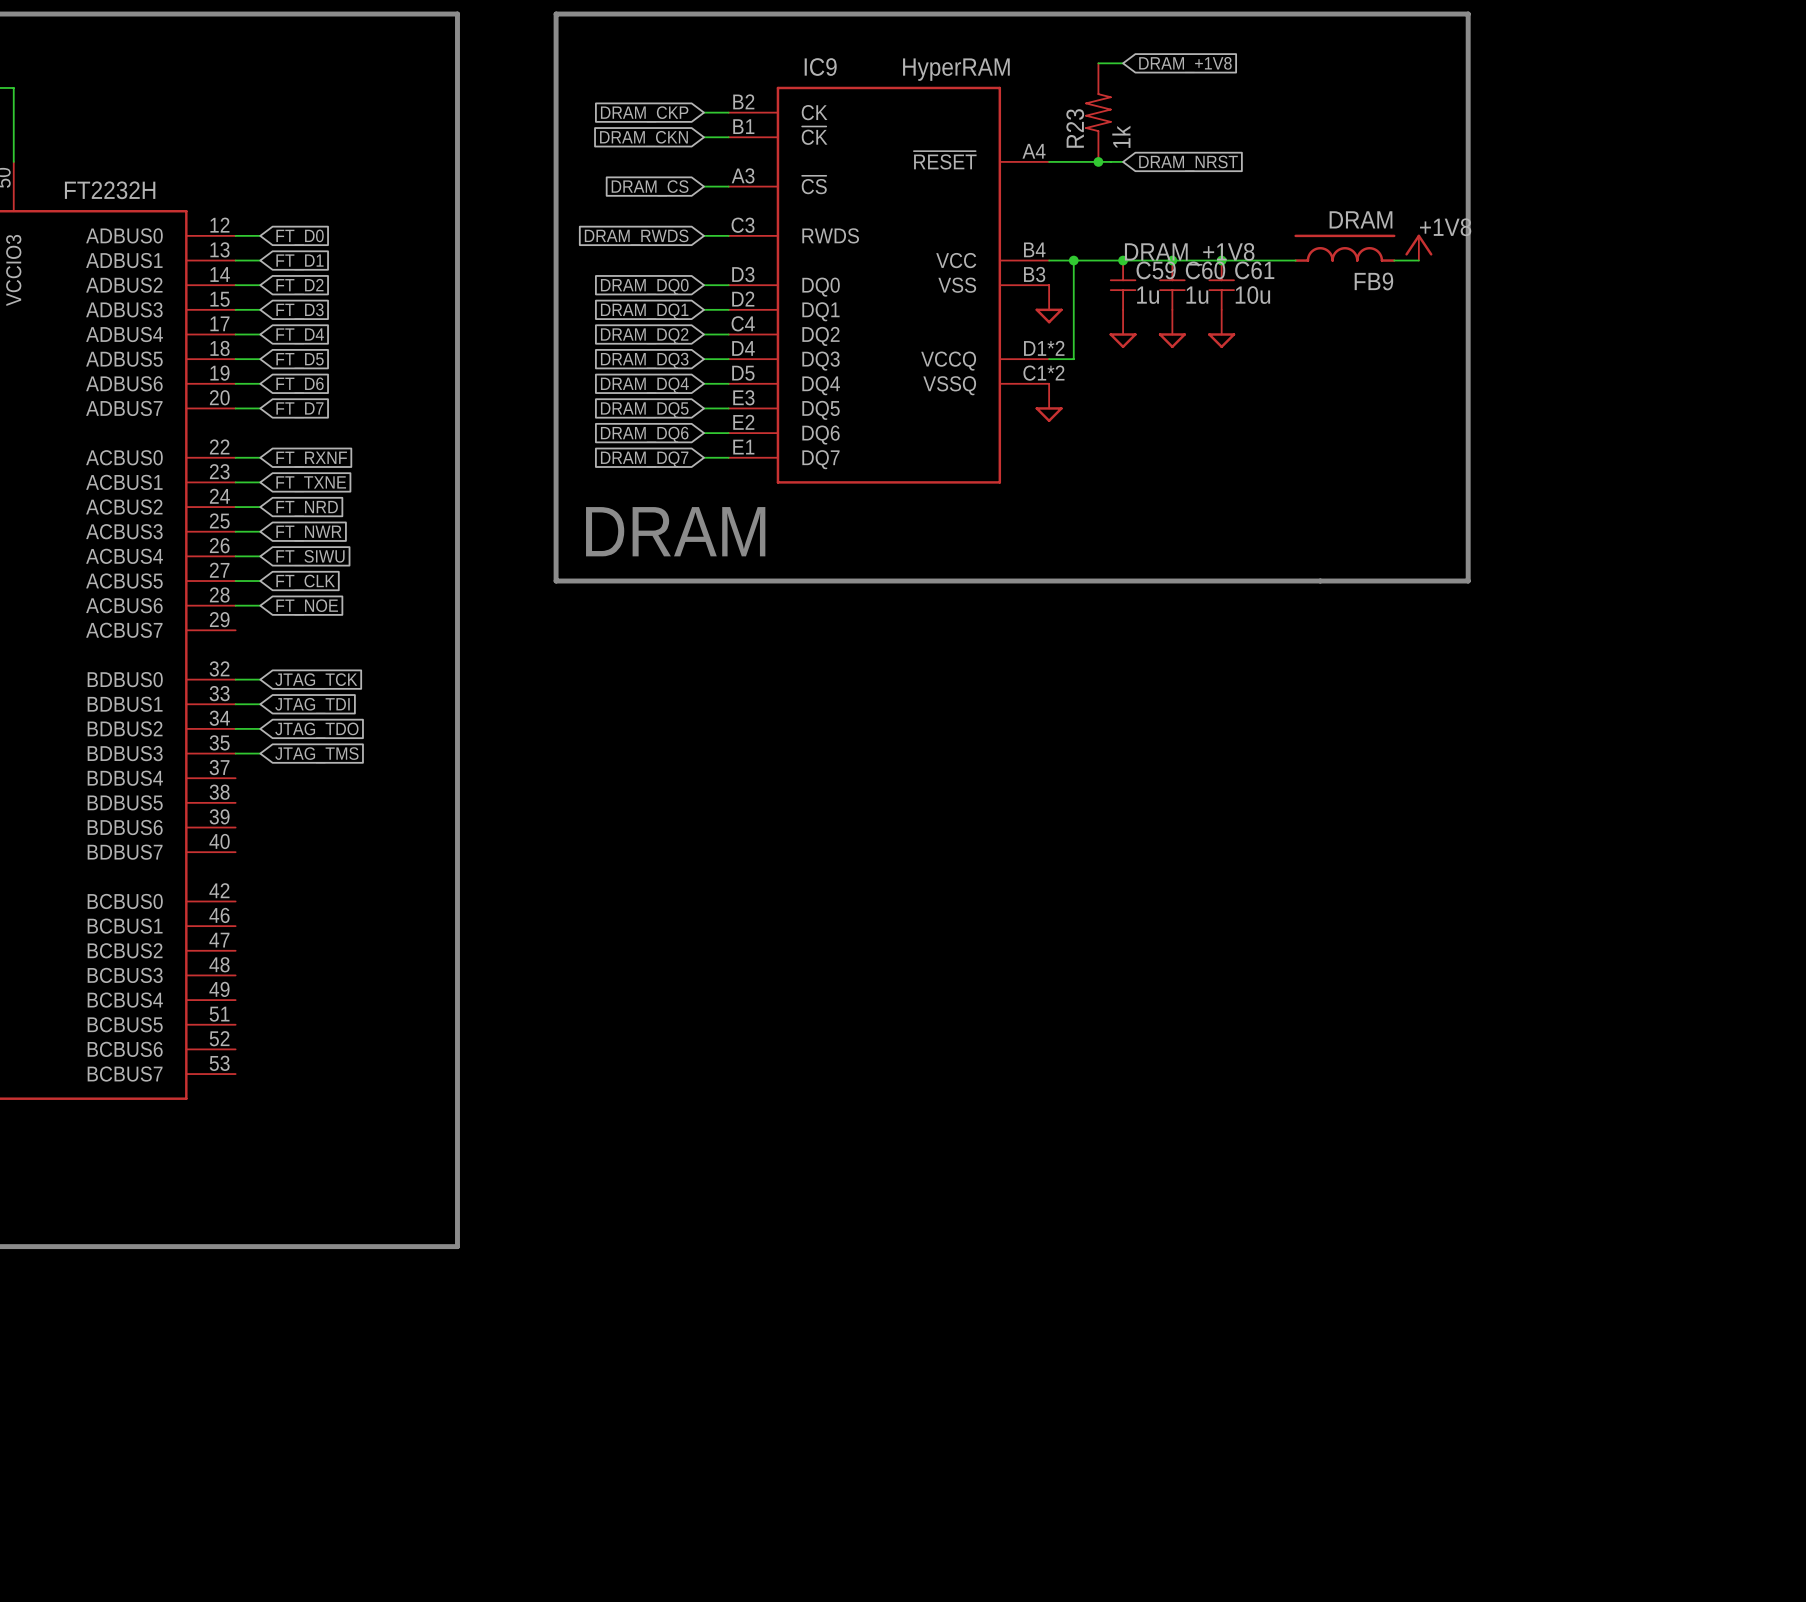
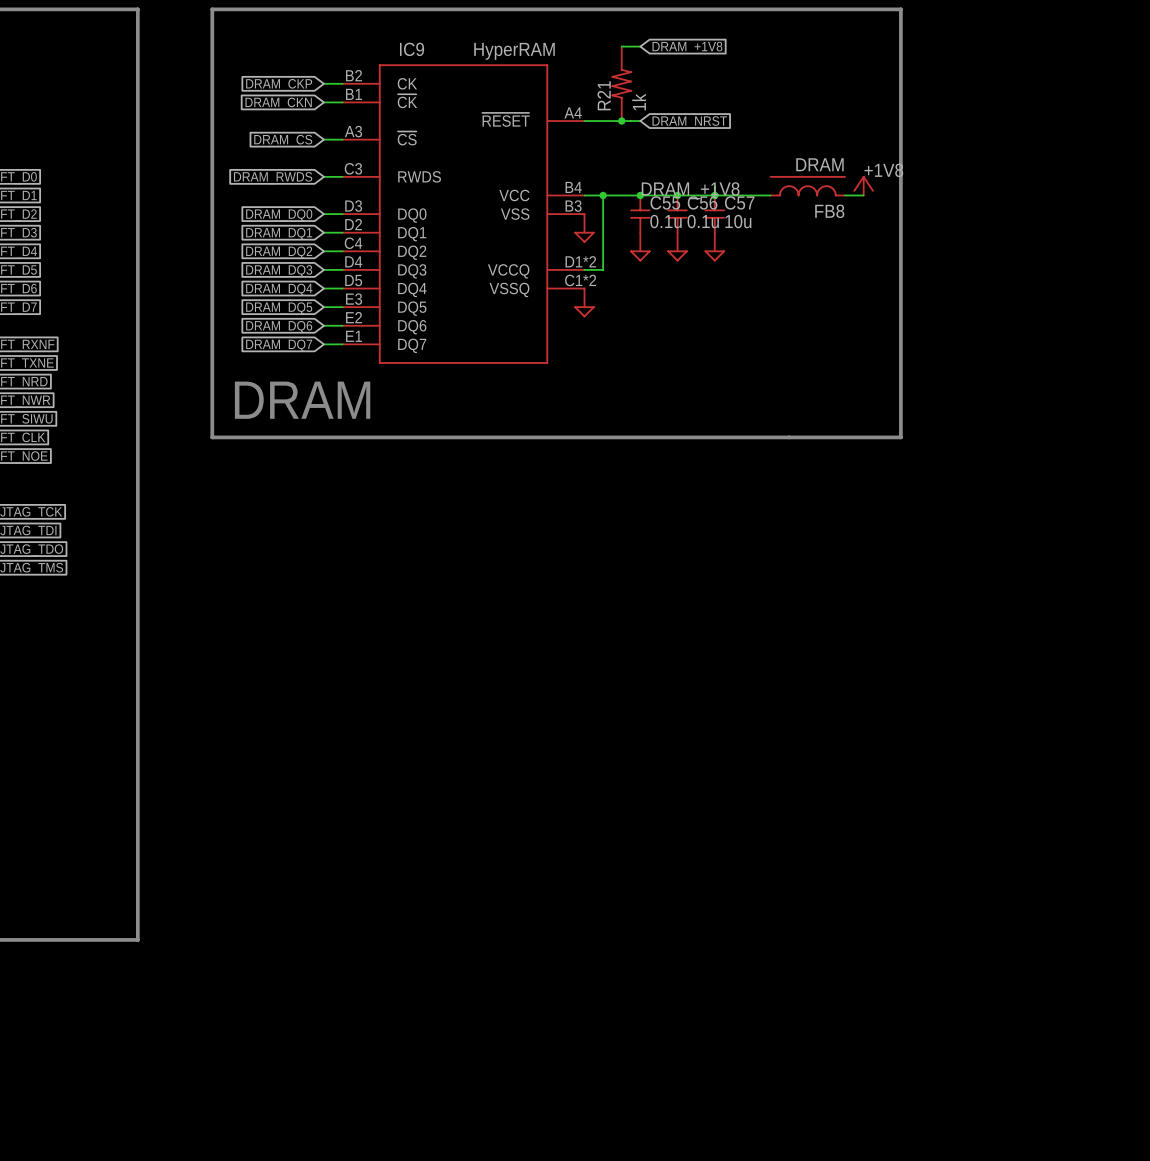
R23 name: R23 (1075, 128) -> R21 (604, 95)
C59 name: C59 (1156, 270) -> C55 (665, 202)
C60 name: C60 (1205, 270) -> C56 (702, 202)
C61 name: C61 (1254, 270) -> C57 (739, 202)
FB9 name: FB9 (1373, 281) -> FB8 (829, 211)
C59 value: 1u (1148, 295) -> 0.1u (665, 221)
C60 value: 1u (1197, 295) -> 0.1u (703, 221)

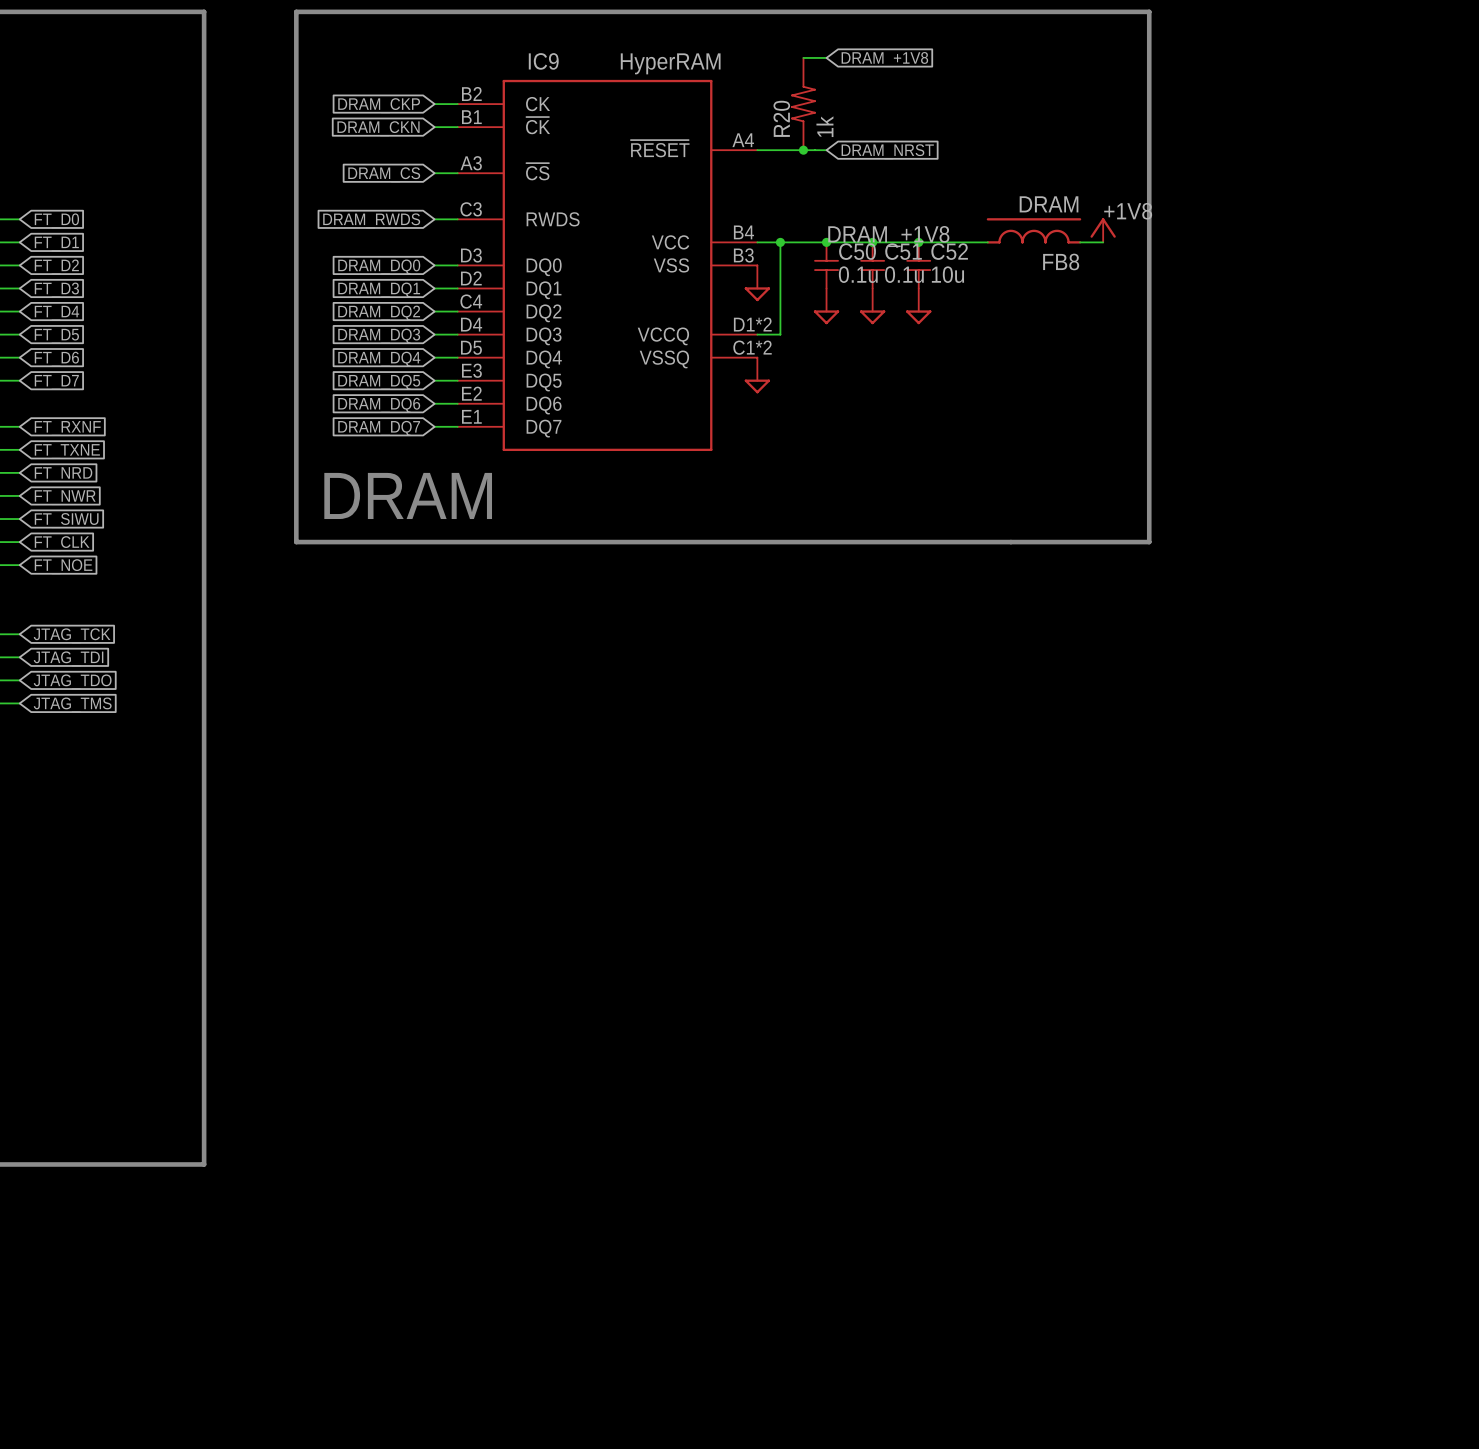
R21 name: R21 (604, 95) -> R20 (781, 118)
C55 name: C55 (665, 202) -> C50 (857, 251)
C56 name: C56 (702, 202) -> C51 (903, 251)
C57 name: C57 (739, 202) -> C52 (949, 251)

